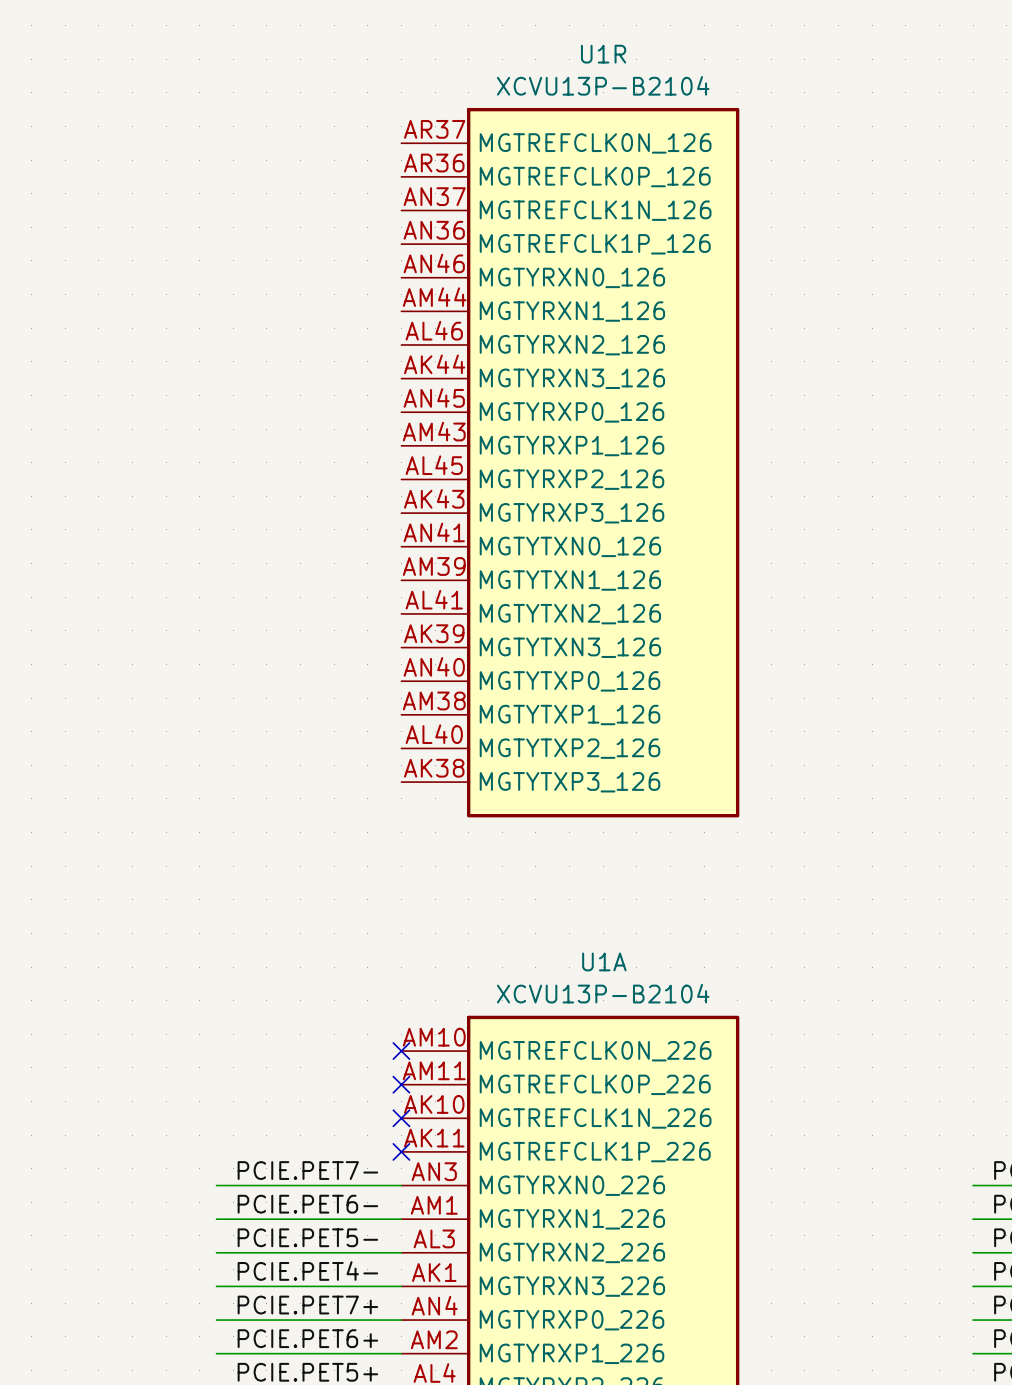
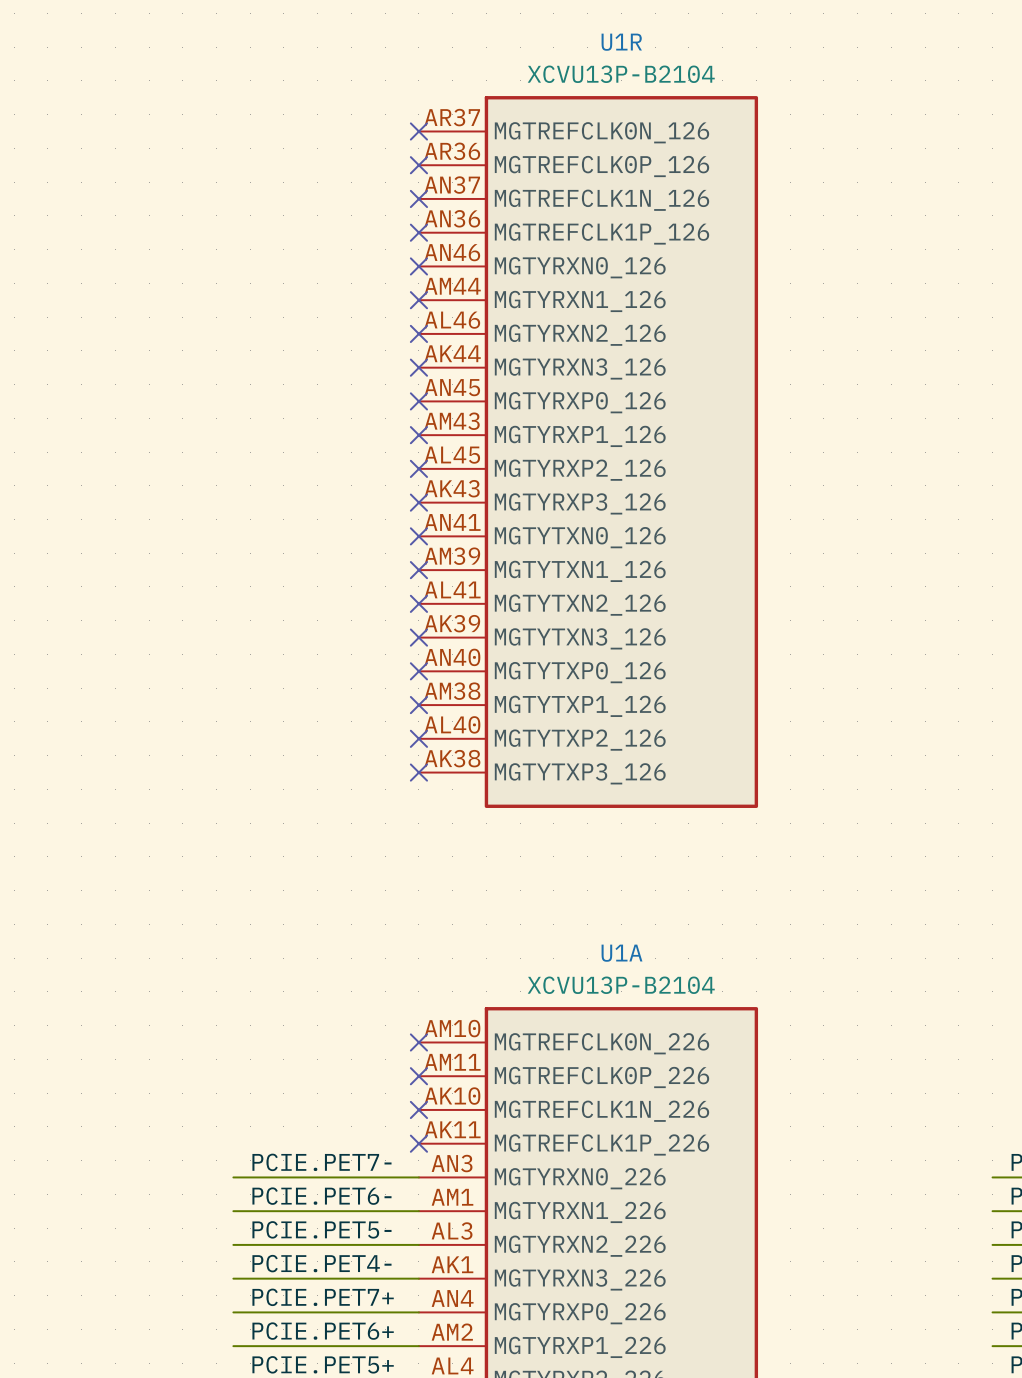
no-connect mark: none -> (418, 131)
no-connect mark: none -> (418, 165)
no-connect mark: none -> (418, 198)
no-connect mark: none -> (418, 232)
no-connect mark: none -> (418, 266)
no-connect mark: none -> (418, 300)
no-connect mark: none -> (418, 333)
no-connect mark: none -> (418, 367)
no-connect mark: none -> (418, 401)
no-connect mark: none -> (418, 435)
no-connect mark: none -> (418, 468)
no-connect mark: none -> (418, 502)
no-connect mark: none -> (418, 536)
no-connect mark: none -> (418, 570)
no-connect mark: none -> (418, 603)
no-connect mark: none -> (418, 637)
no-connect mark: none -> (418, 671)
no-connect mark: none -> (418, 705)
no-connect mark: none -> (418, 738)
no-connect mark: none -> (418, 772)

